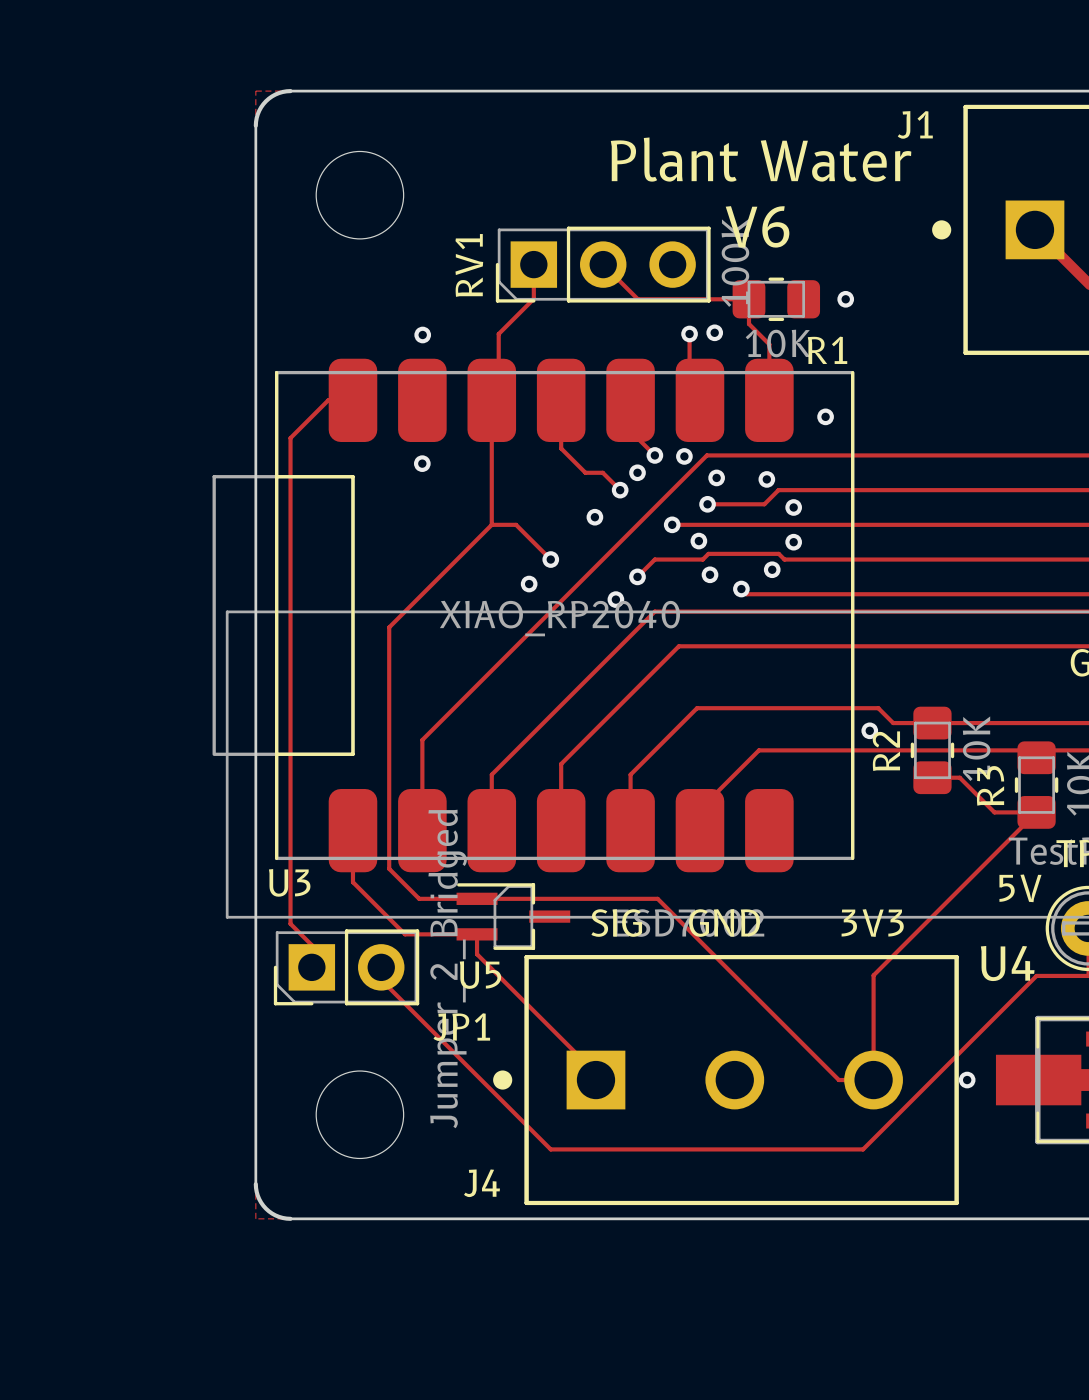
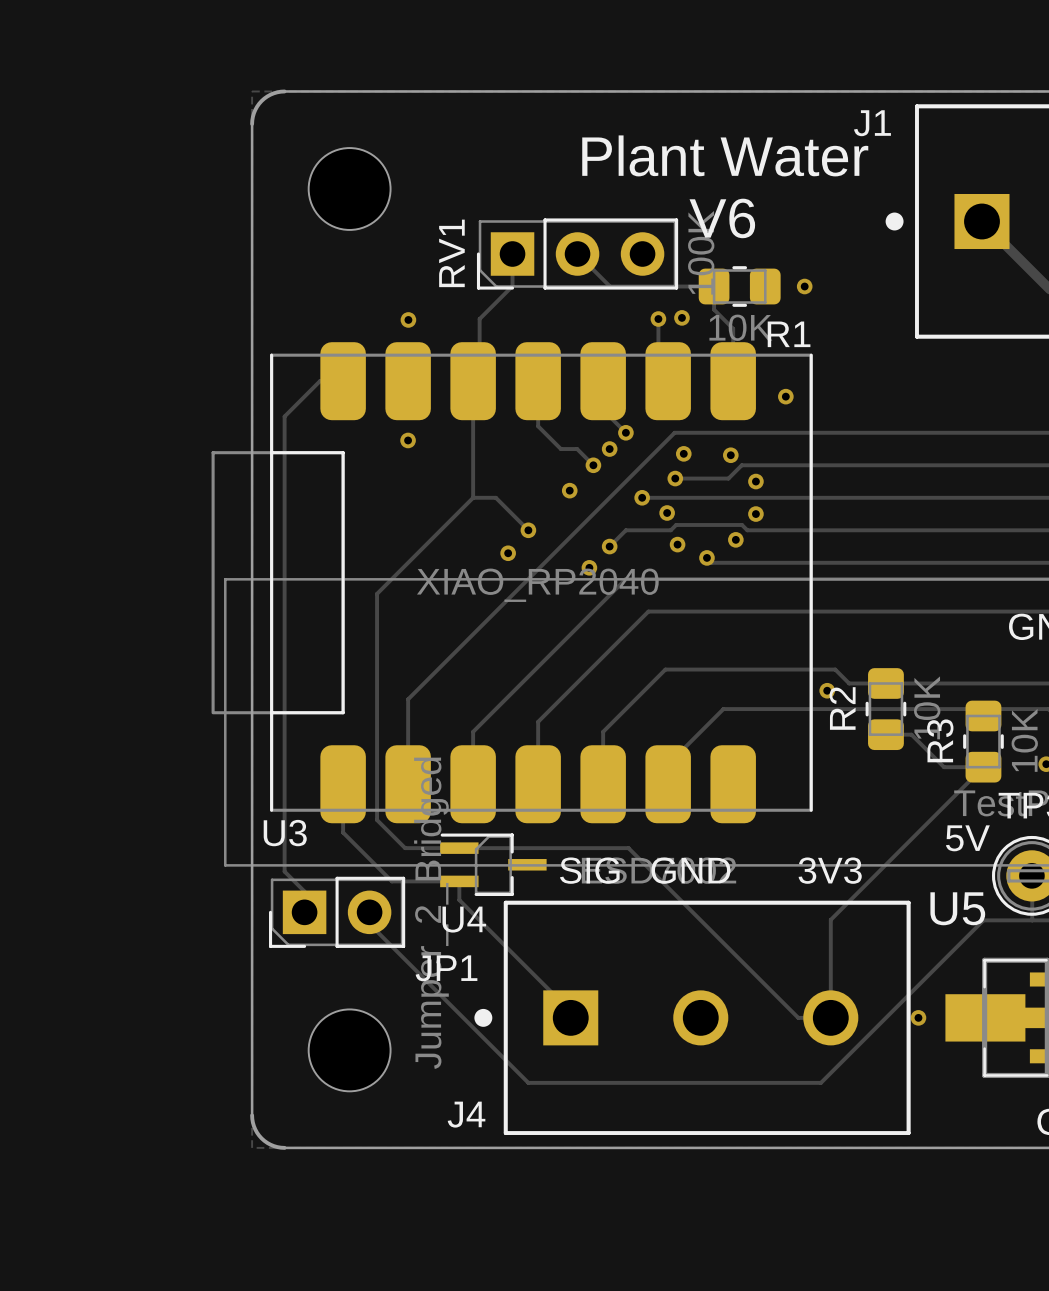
via: (684, 456) -> none
U4 name: U4 (1007, 963) -> U5 (957, 908)
U5 name: U5 (480, 975) -> U4 (464, 919)

